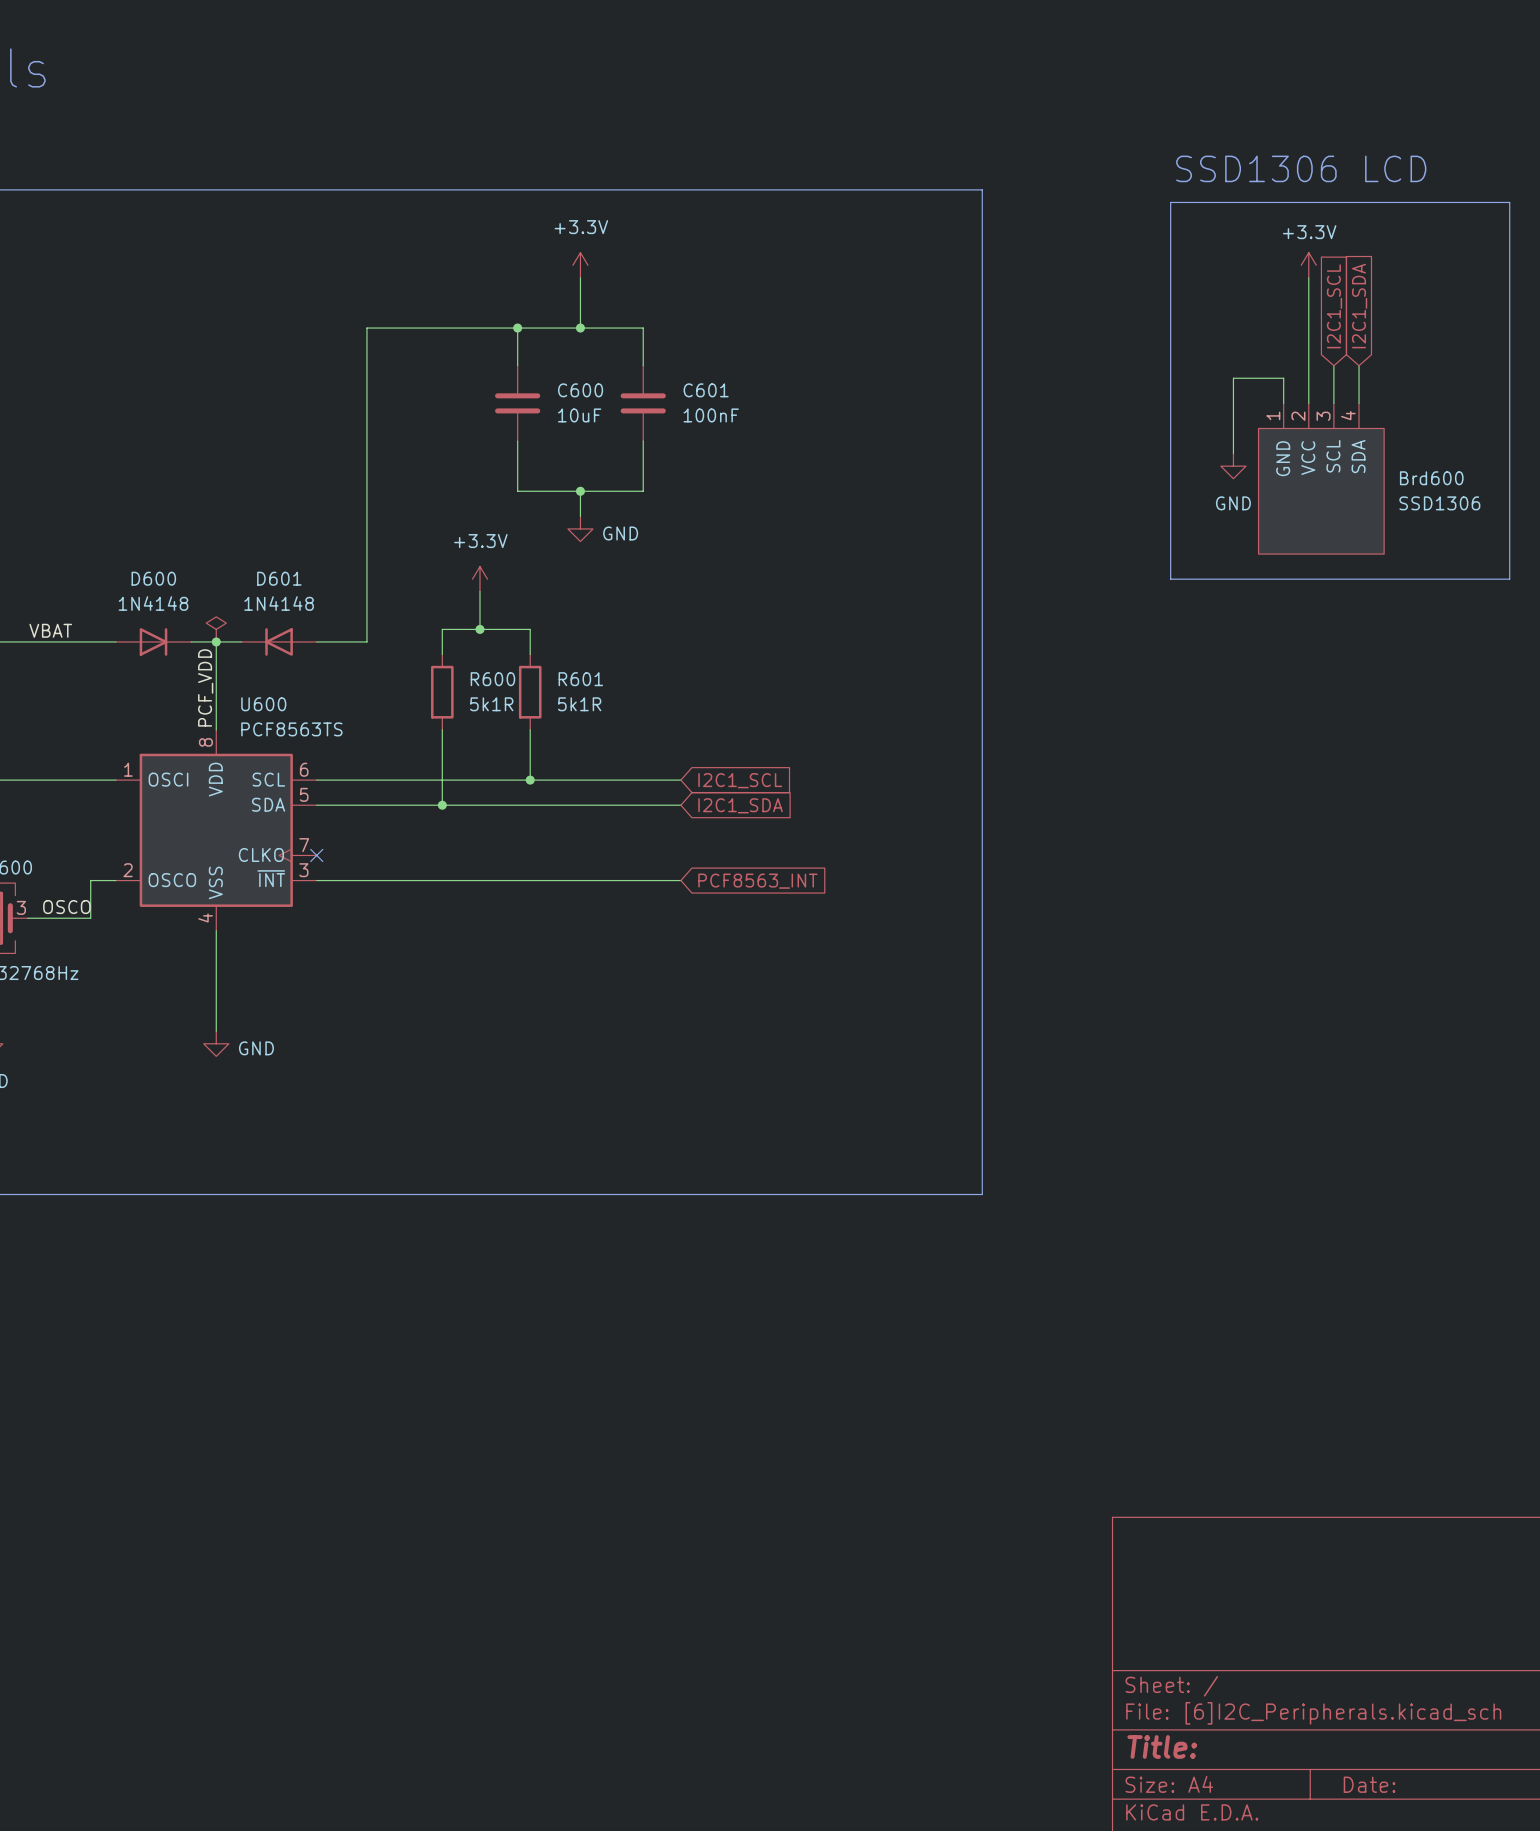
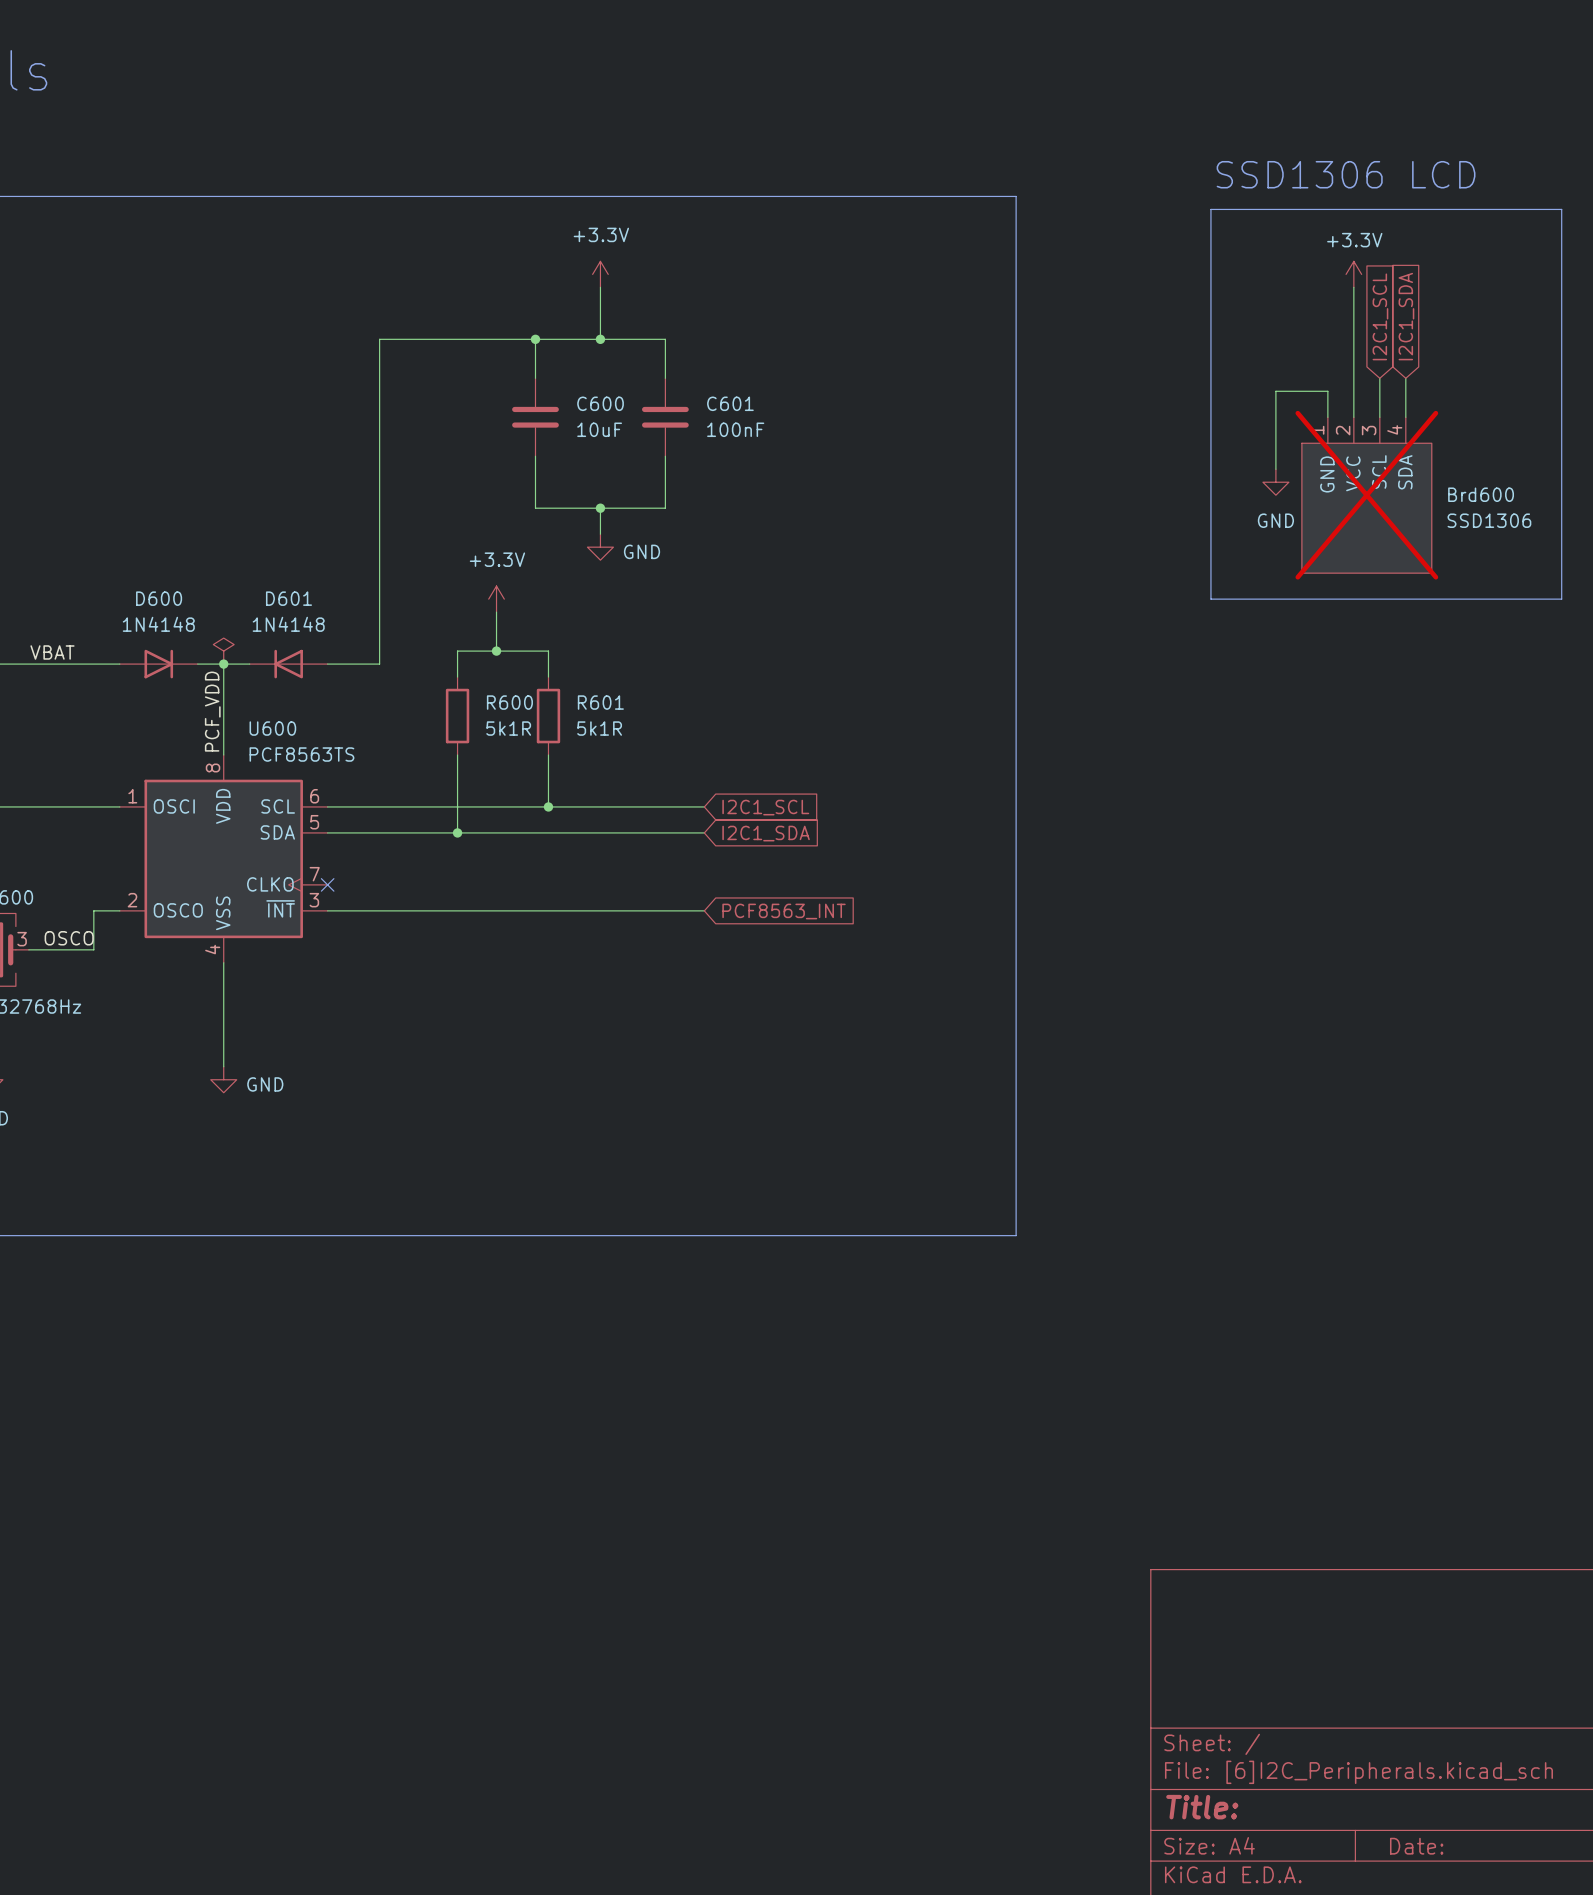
Brd600 do-not-place cross: none -> (1366, 495)

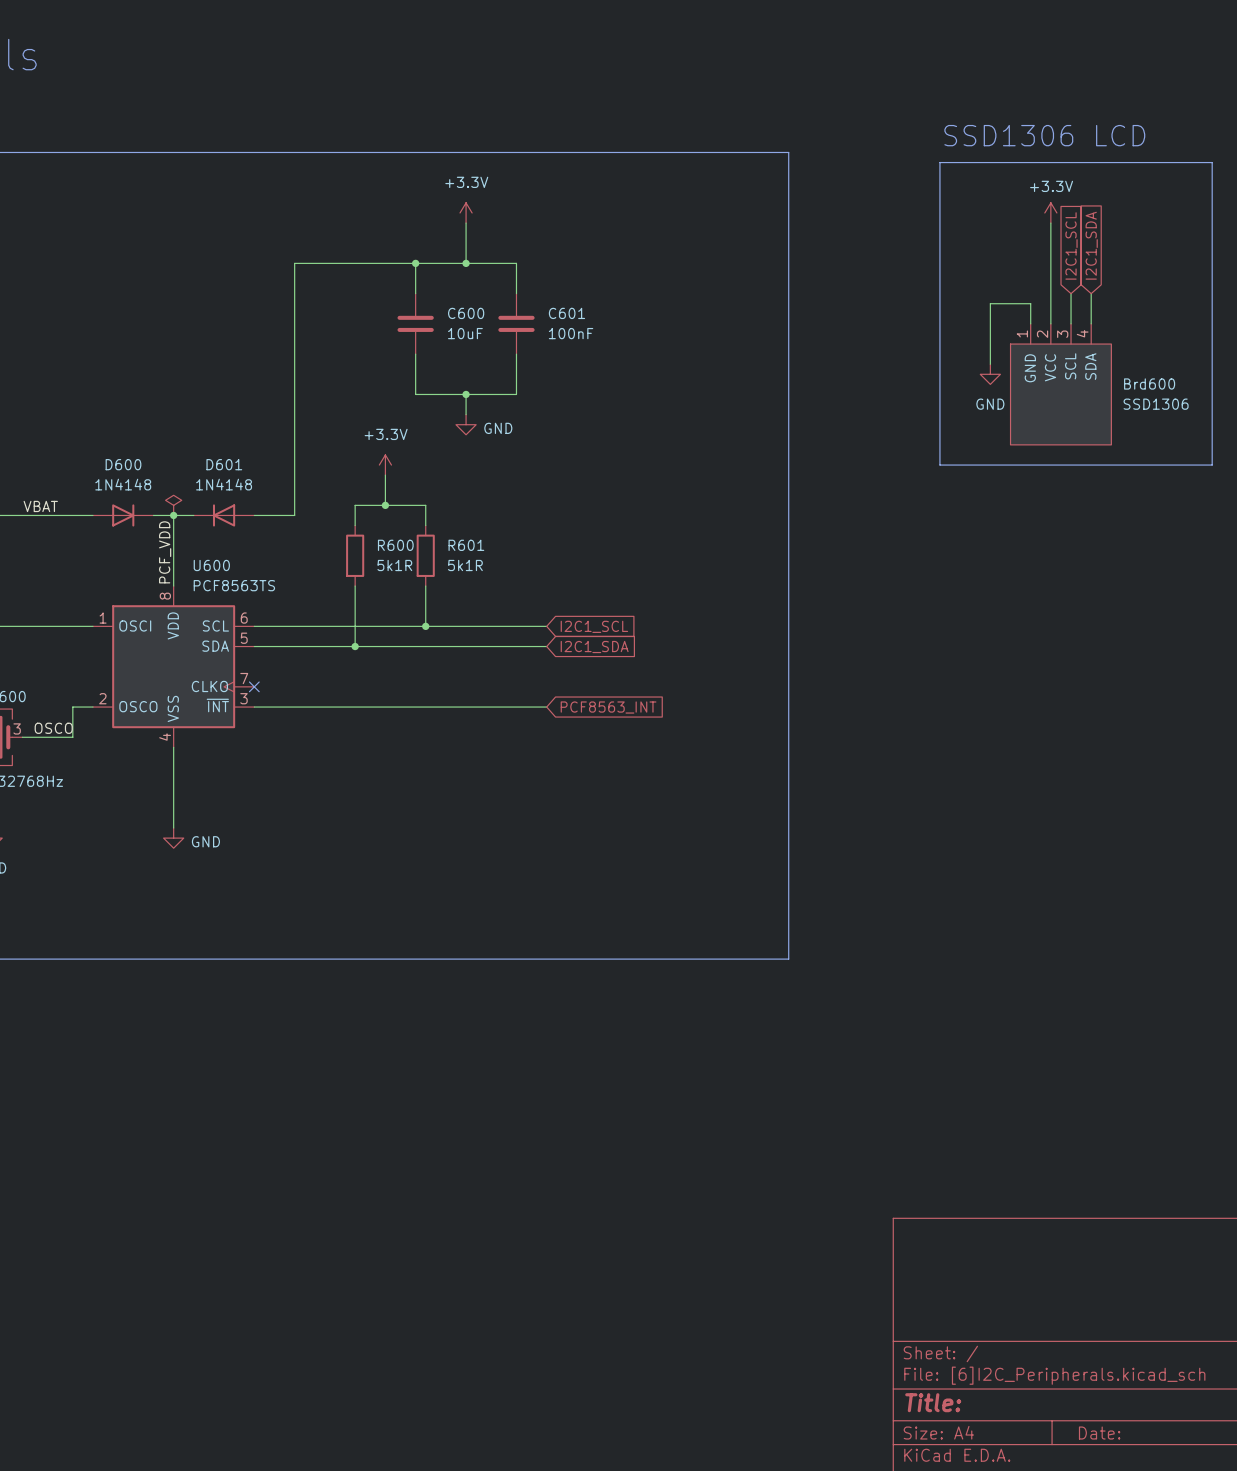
Brd600 do-not-place cross: (1366, 495) -> none

